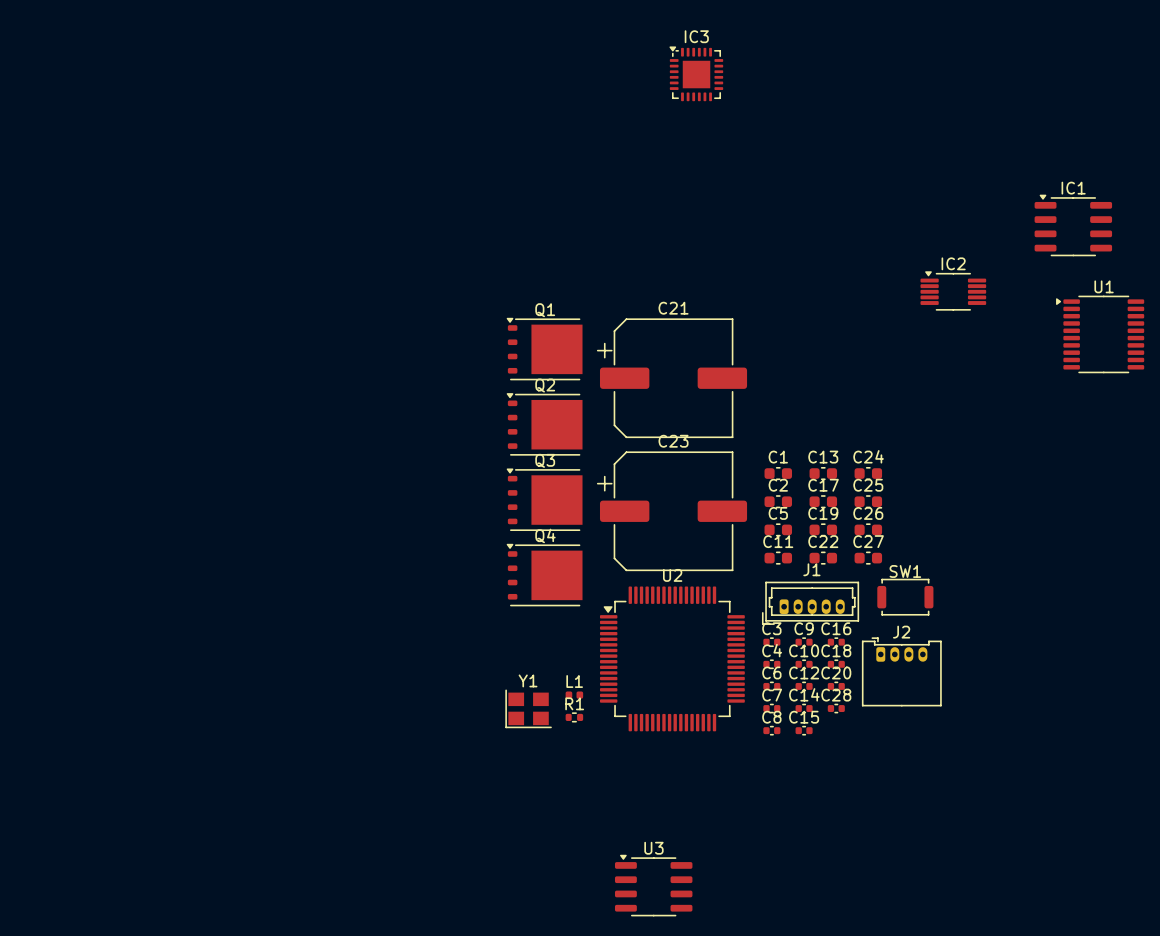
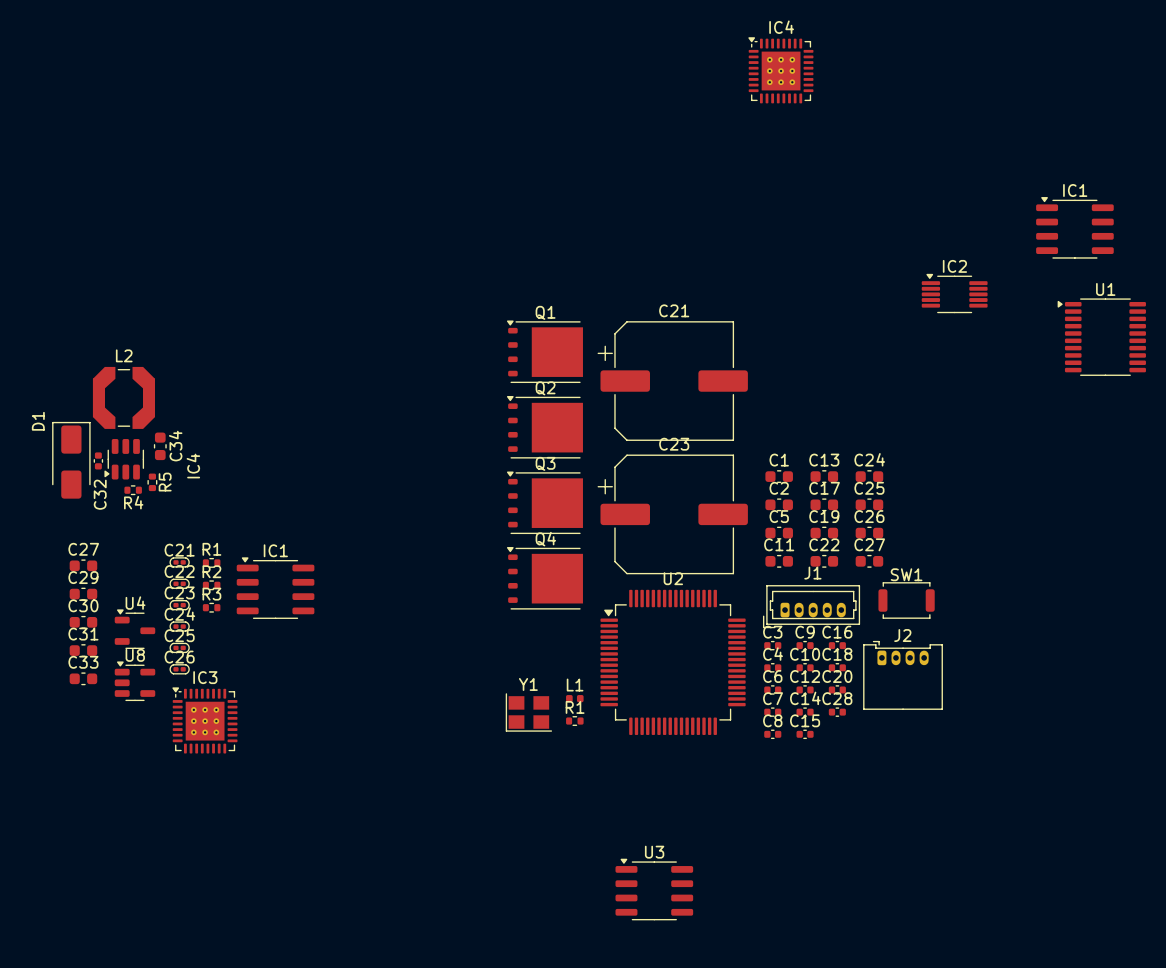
IC3 footprint: [669, 46, 724, 102] -> [172, 687, 238, 754]
IC4: none -> (780, 70)
L2: none -> (123, 397)
C34: none -> (160, 446)
IC4: none -> (124, 459)
D1: none -> (71, 460)
C32: none -> (98, 460)
R5: none -> (152, 482)
R4: none -> (133, 490)
C21: none -> (179, 562)
R1: none -> (211, 562)
C27: none -> (83, 565)
C22: none -> (179, 583)
R2: none -> (211, 585)
IC1: none -> (275, 588)
C29: none -> (83, 594)
C23: none -> (179, 605)
R3: none -> (211, 607)
C30: none -> (83, 622)
C24: none -> (179, 626)
U4: none -> (134, 629)
C25: none -> (179, 647)
C31: none -> (83, 650)
C26: none -> (179, 669)
C33: none -> (83, 678)
U8: none -> (134, 681)

